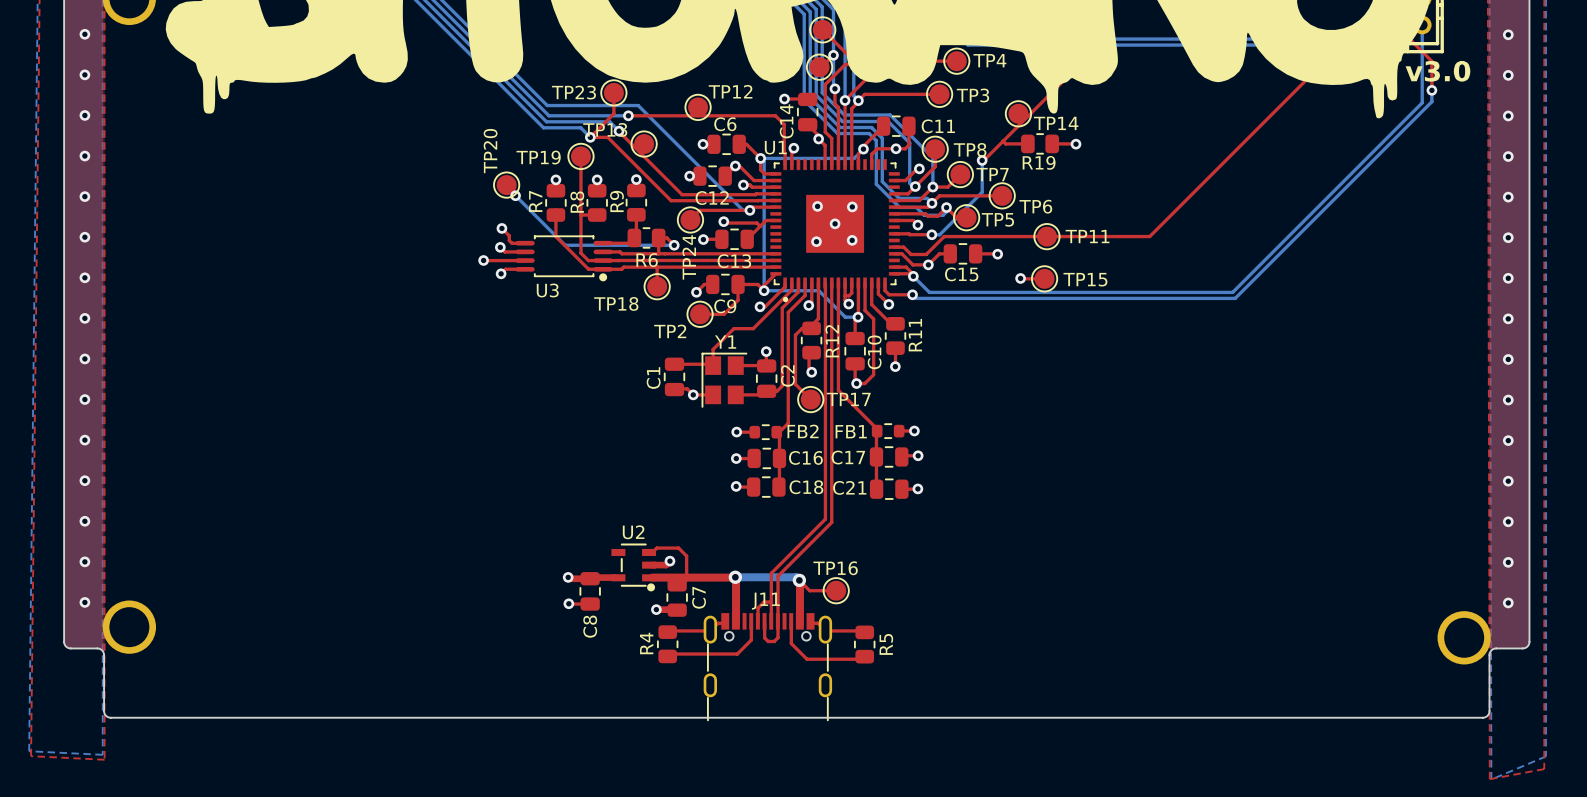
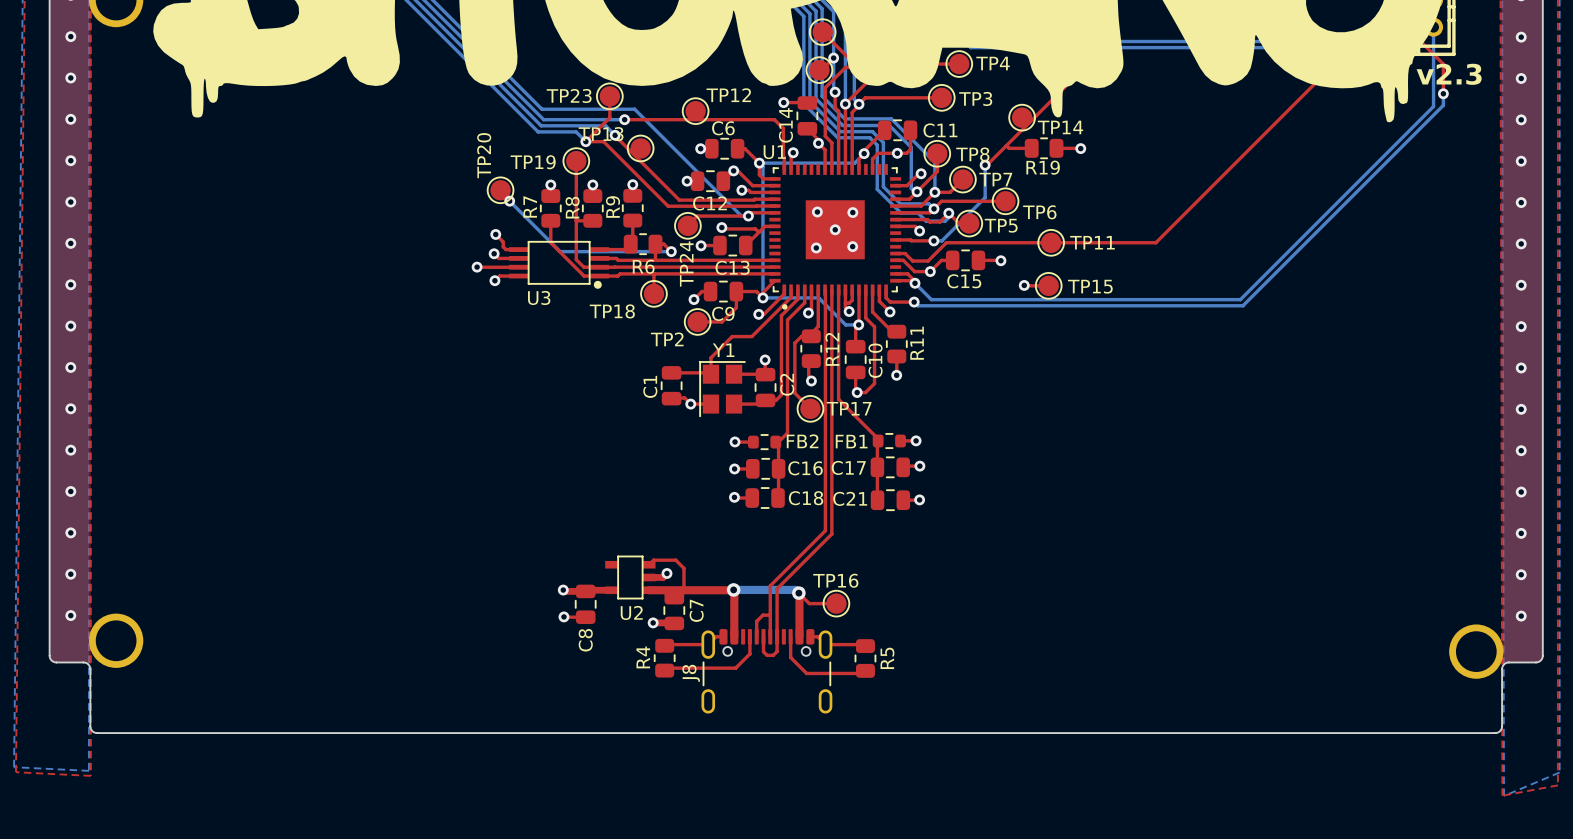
text: v3.0 (1437, 71) -> v2.3 (1449, 74)
U3 footprint: [515, 235, 613, 282] -> [509, 241, 610, 289]
U2 name position: U2 (633, 532) -> U2 (631, 612)
U2 footprint: [611, 543, 657, 592] -> [605, 555, 656, 600]
J8: none -> (766, 671)
J11: (767, 667) -> none

